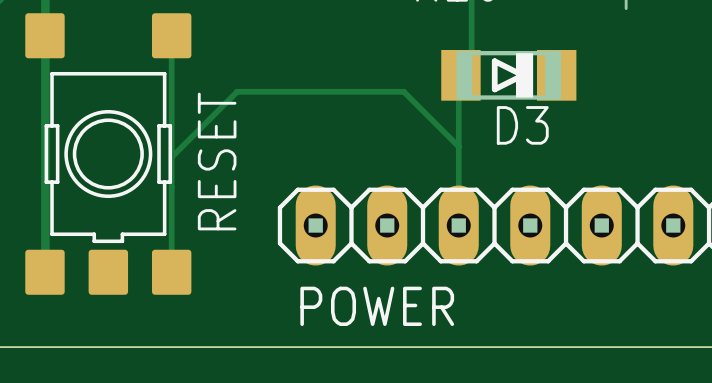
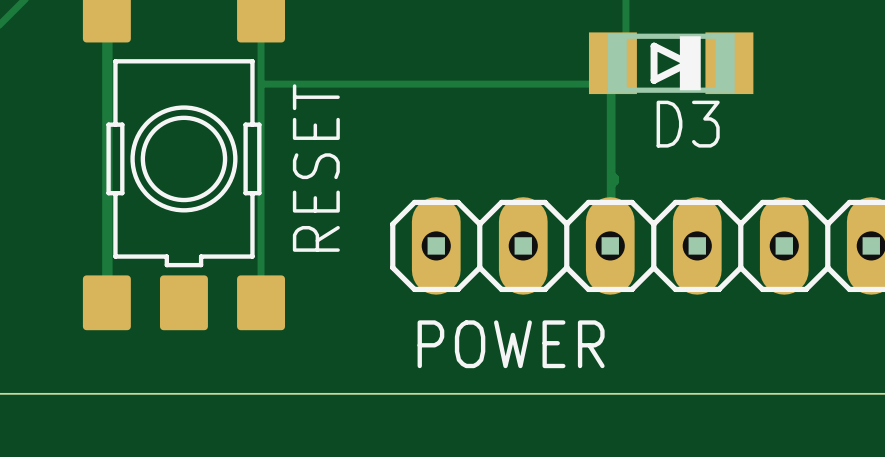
track: none -> (264, 84) (612, 84) (612, 174) (615, 178) (615, 181) (612, 185) (611, 244)
track: (458, 146) (403, 91) (237, 91) (171, 157) -> none

